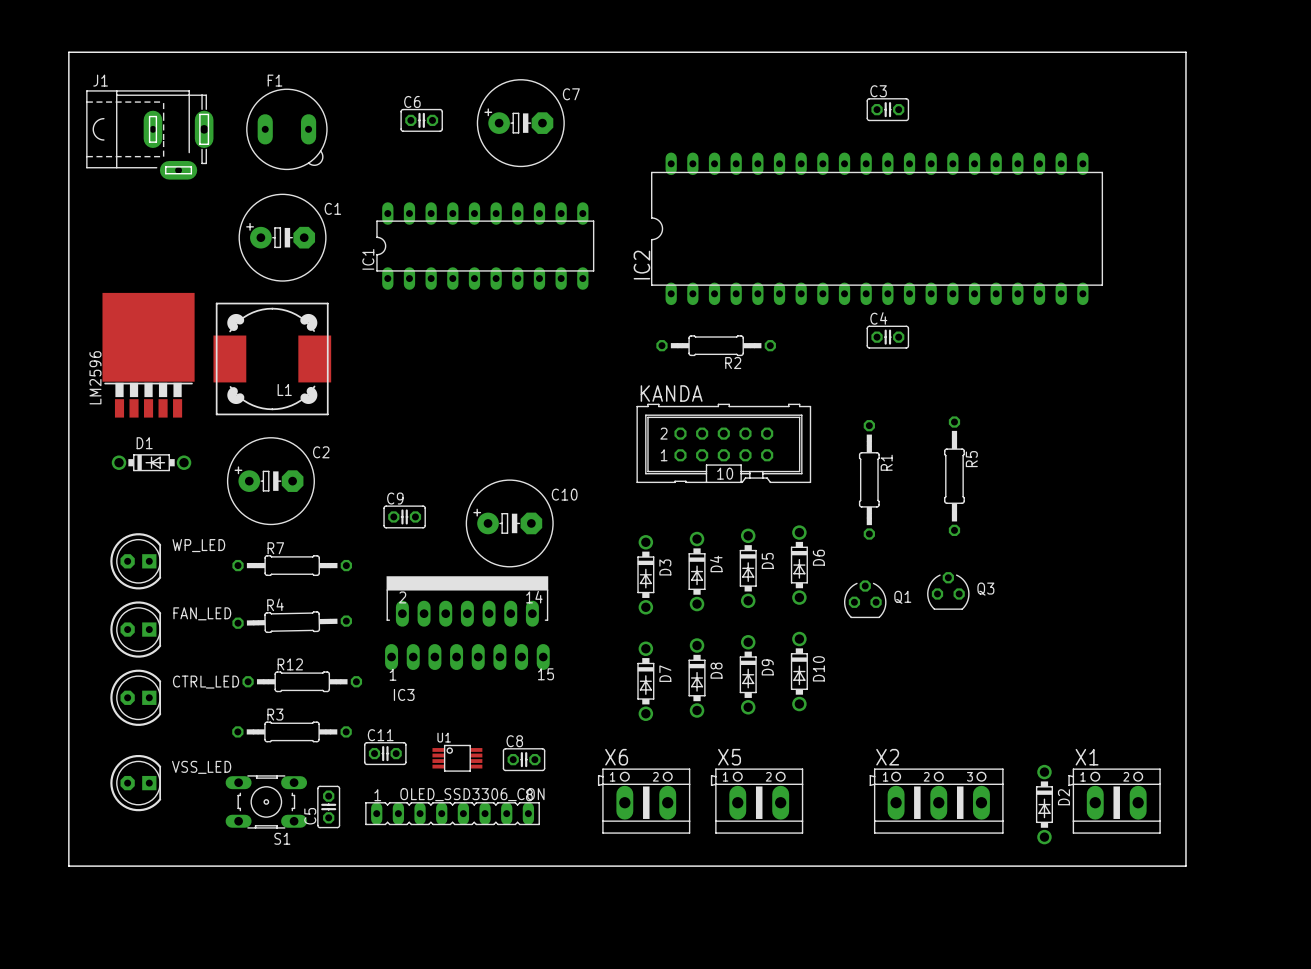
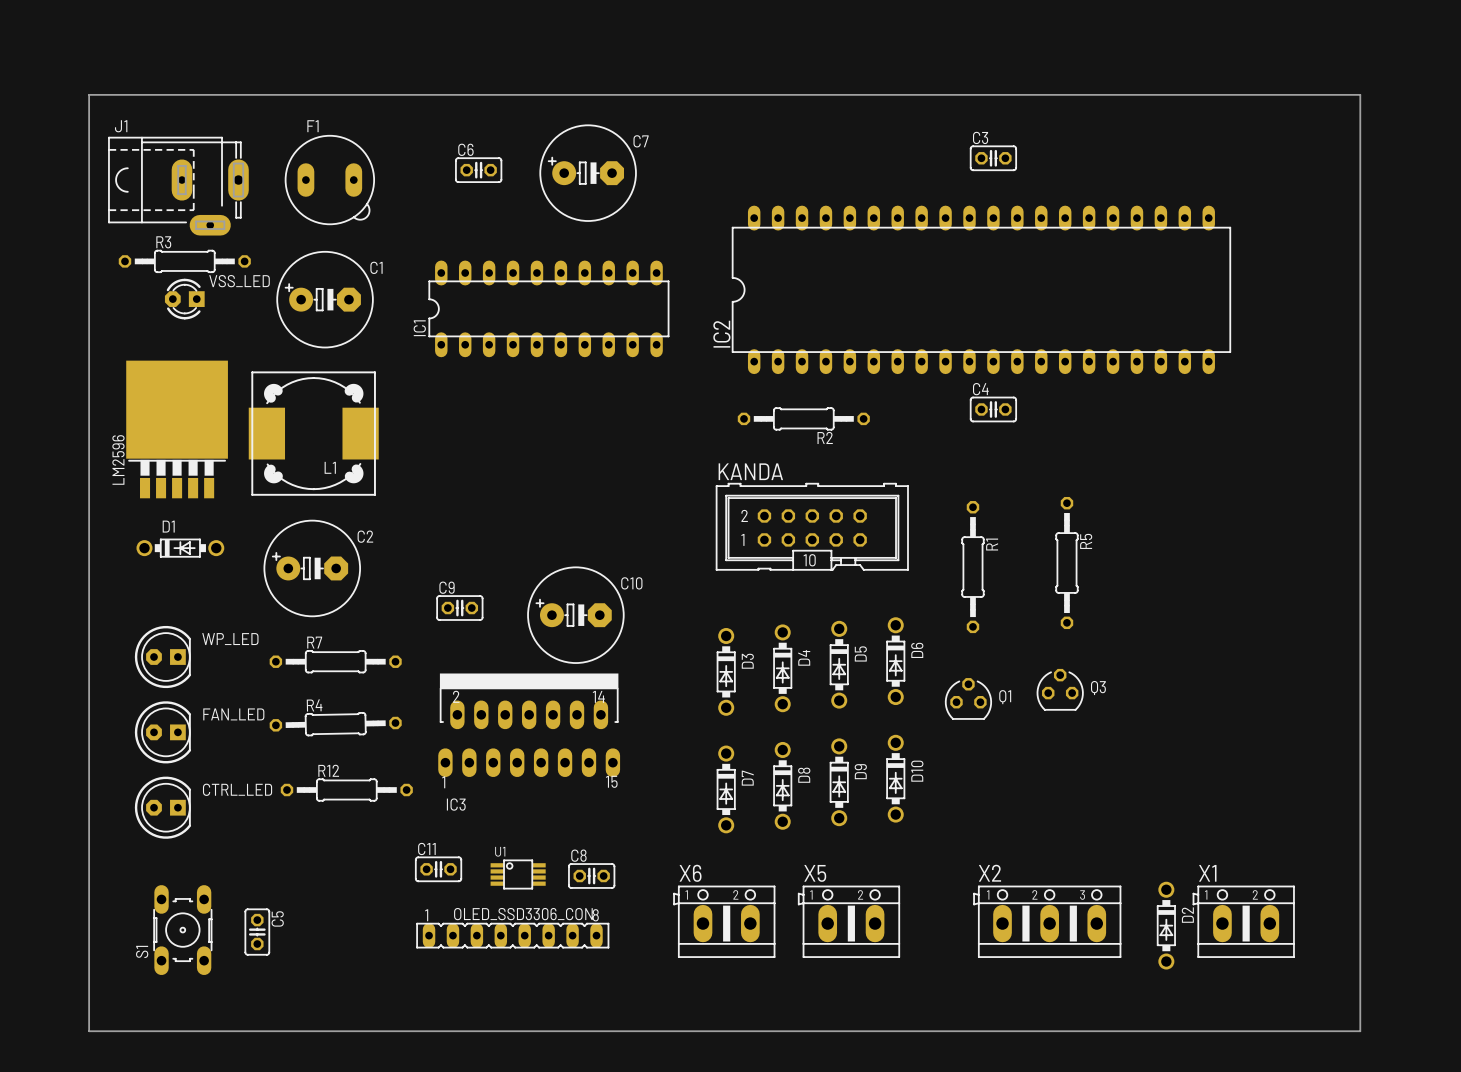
board edge: (1185, 52) (1185, 866) (68, 866) -> (1322, 94) (1360, 94) (1360, 1031) (89, 1031) (89, 993)
VSS_LED: none -> (184, 299)
R3 position: (292, 731) -> (184, 261)
VSS_LED: (135, 783) -> none
S1 rotation: 0° (266, 801) -> 90° clockwise (182, 930)
S1 position: (266, 801) -> (182, 930)
C5 position: (328, 806) -> (257, 932)
C5 name position: C5 (310, 816) -> C5 (277, 918)

